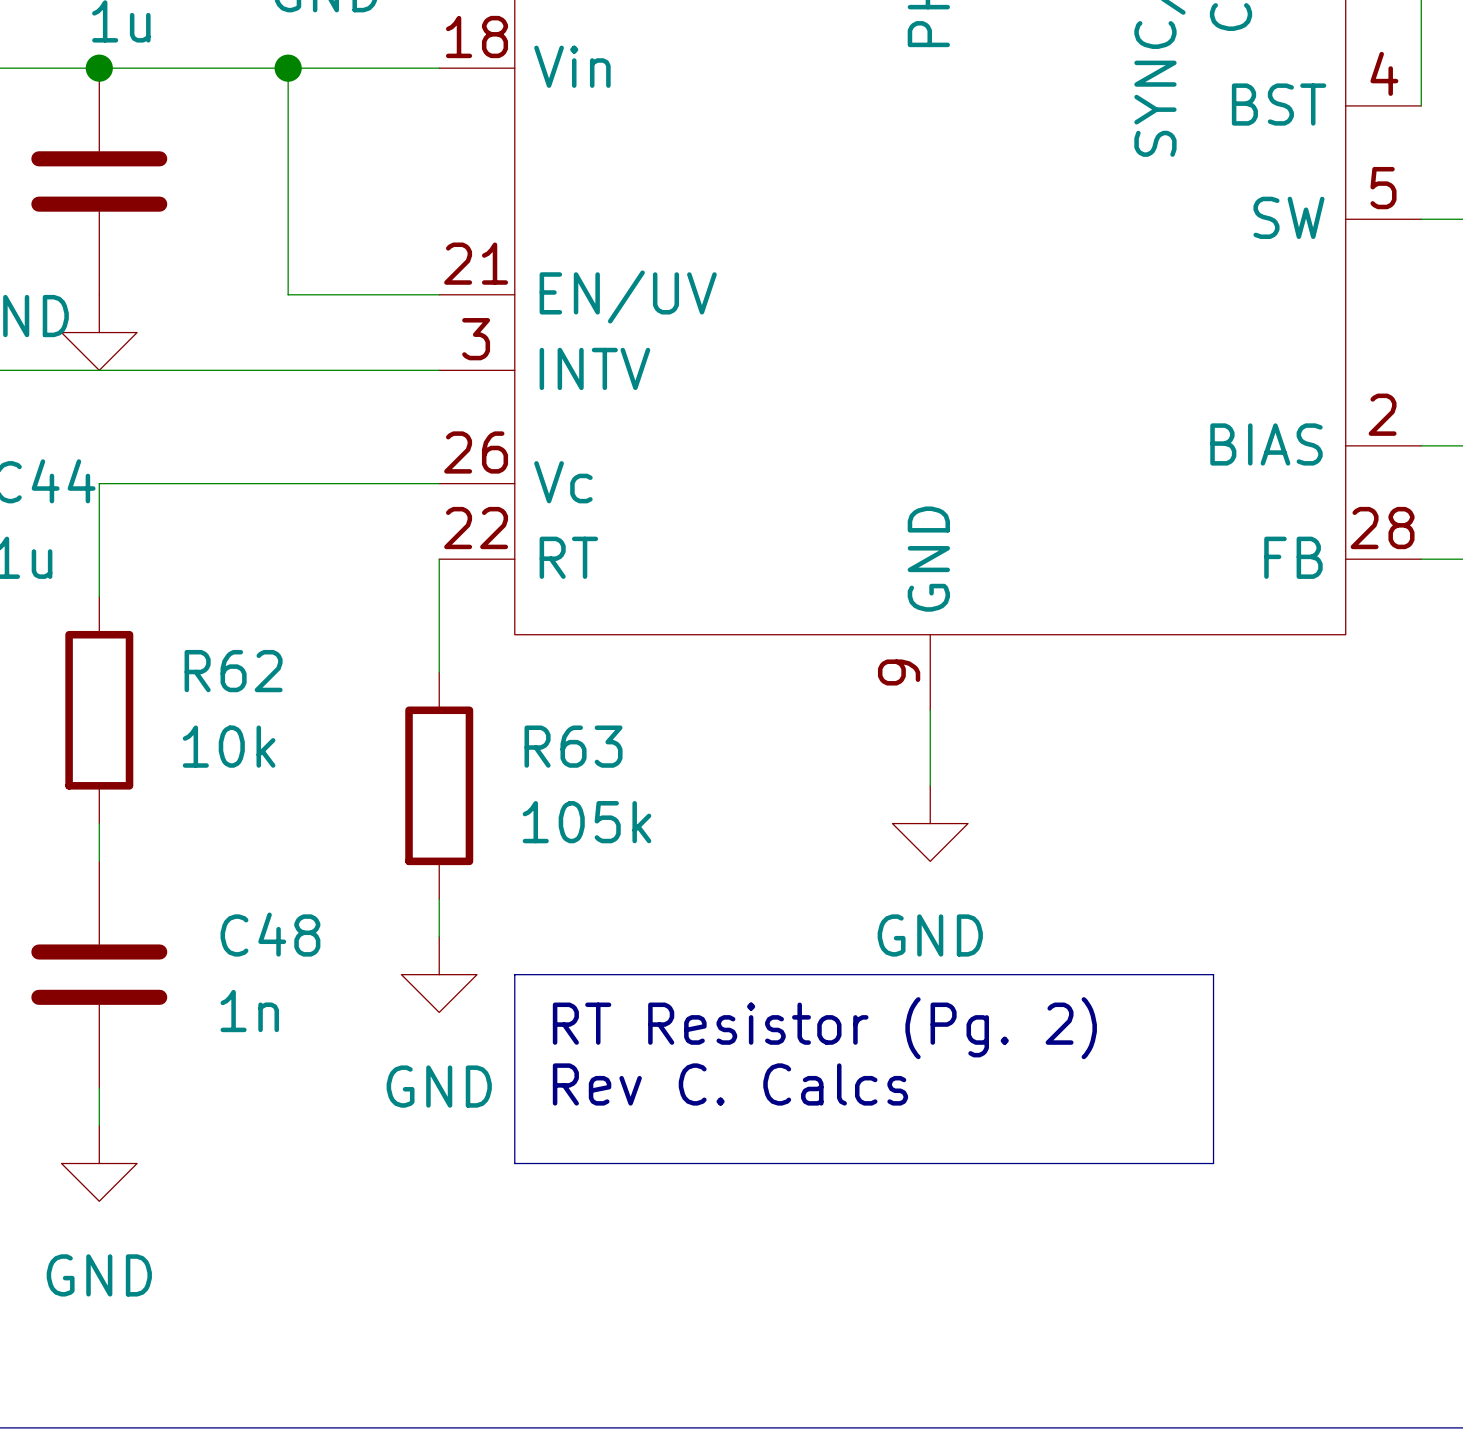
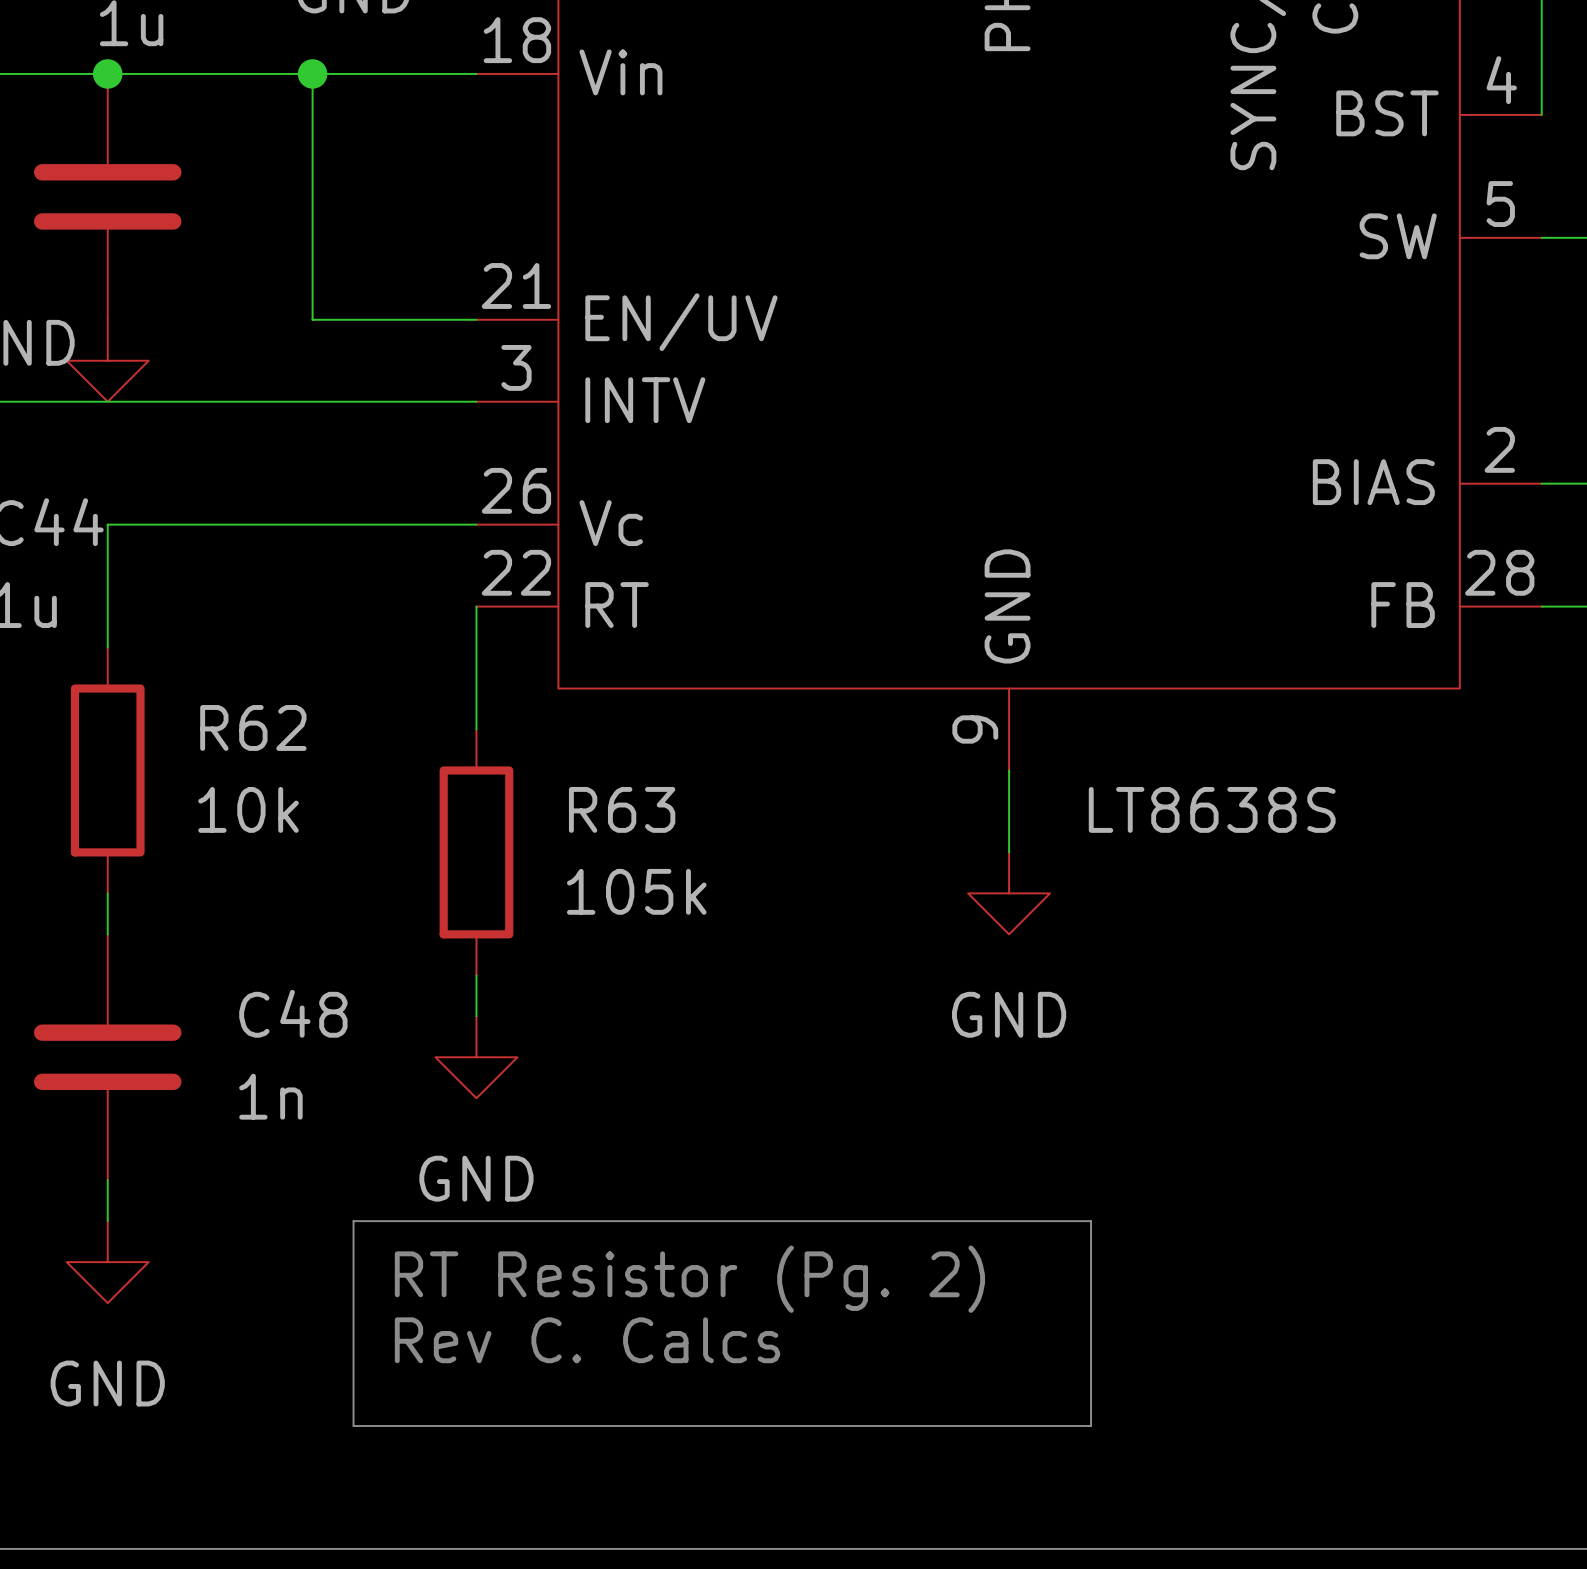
part value: none -> LT8638S (1212, 809)
line: (514, 974) (1213, 974) (1213, 1163) (514, 1163) (514, 974) -> none
text position: RT Resistor (Pg. 2) (824, 1028) -> RT Resistor (Pg. 2) (689, 1279)
text position: Rev C. Calcs (730, 1084) -> Rev C. Calcs (587, 1340)
line: none -> (353, 1221) (1091, 1221) (1091, 1426) (353, 1426) (353, 1221)

